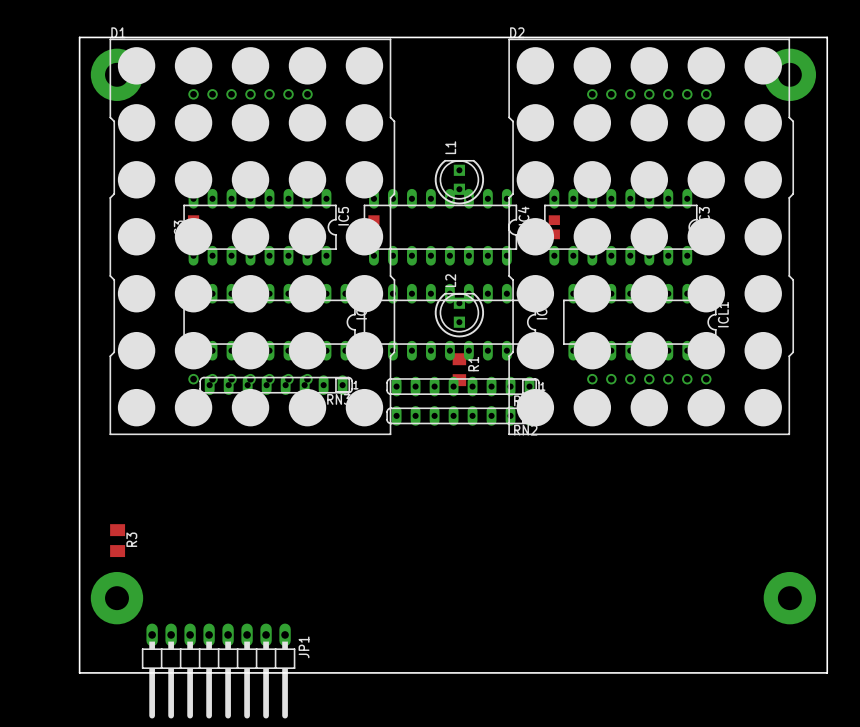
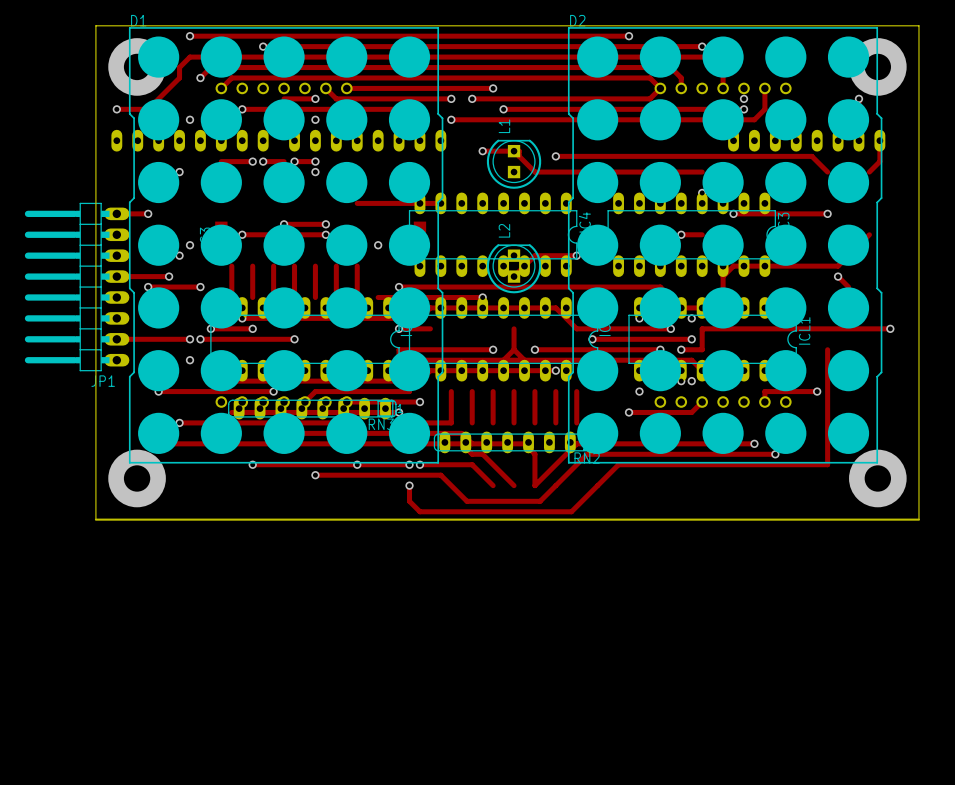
track: none -> (190, 36) (629, 36)
via: none -> (190, 36)
via: none -> (629, 36)
track: none -> (263, 46) (702, 46)
via: none -> (263, 46)
via: none -> (702, 46)
track: none -> (200, 77) (210, 67) (670, 67) (681, 77) (681, 88)
via: none -> (200, 77)
track: none -> (221, 88) (231, 77) (649, 77) (660, 88) (649, 98) (472, 98)
track: none -> (325, 88) (336, 98) (451, 98)
track: none -> (346, 88) (493, 88)
via: none -> (493, 88)
track: none -> (723, 88) (723, 67) (712, 57) (190, 57) (179, 67) (179, 77) (148, 109) (116, 109)
track: none -> (764, 88) (764, 109) (754, 119) (451, 119)
track: none -> (284, 98) (315, 98)
via: none -> (315, 98)
via: none -> (451, 98)
via: none -> (472, 98)
via: none -> (744, 98)
via: none -> (858, 98)
via: none -> (116, 109)
track: none -> (242, 109) (419, 109)
via: none -> (242, 109)
track: none -> (503, 109) (744, 109)
via: none -> (503, 109)
via: none -> (744, 109)
via: none -> (190, 119)
via: none -> (315, 119)
via: none -> (451, 119)
part: none -> (190, 140)
part: none -> (367, 140)
part: none -> (806, 140)
track: none -> (879, 140) (879, 161) (869, 172)
track: none -> (482, 151) (519, 151) (519, 156)
via: none -> (482, 151)
track: none -> (514, 151) (534, 172) (702, 172)
track: none -> (555, 156) (811, 156) (827, 172)
via: none -> (555, 156)
track: none -> (221, 161) (252, 161)
via: none -> (252, 161)
track: none -> (263, 161) (284, 161)
via: none -> (263, 161)
track: none -> (294, 161) (315, 161)
via: none -> (294, 161)
via: none -> (315, 161)
via: none -> (179, 172)
via: none -> (315, 172)
L1 position: (459, 182) -> (514, 164)
via: none -> (702, 192)
track: none -> (357, 203) (440, 203)
track: none -> (116, 213) (148, 213)
via: none -> (148, 213)
track: none -> (733, 213) (827, 213)
via: none -> (733, 213)
via: none -> (827, 213)
track: none -> (284, 224) (325, 224)
via: none -> (284, 224)
via: none -> (325, 224)
track: none -> (242, 234) (325, 234)
via: none -> (242, 234)
IC5: (260, 227) -> none
via: none -> (325, 234)
part: (554, 227) -> none
track: none -> (681, 234) (702, 234)
via: none -> (681, 234)
track: none -> (869, 234) (838, 266) (733, 266) (723, 276) (723, 287)
via: none -> (190, 245)
via: none -> (378, 245)
via: none -> (179, 255)
track: none -> (576, 255) (534, 255) (514, 276)
via: none -> (576, 255)
track: none -> (231, 266) (231, 297)
track: none -> (252, 266) (252, 297)
track: none -> (273, 266) (273, 297)
track: none -> (294, 266) (294, 297)
track: none -> (315, 266) (315, 297)
track: none -> (336, 266) (336, 297)
track: none -> (357, 266) (357, 297)
track: none -> (116, 276) (169, 276)
via: none -> (169, 276)
track: none -> (838, 276) (848, 287)
via: none -> (838, 276)
track: none -> (148, 287) (200, 287)
via: none -> (148, 287)
via: none -> (200, 287)
track: none -> (399, 287) (660, 287) (681, 307) (744, 307)
via: none -> (399, 287)
track: none -> (378, 297) (482, 297)
via: none -> (482, 297)
track: none -> (242, 318) (419, 318) (430, 307) (555, 307) (576, 328) (670, 328)
via: none -> (242, 318)
via: none -> (639, 318)
via: none -> (691, 318)
track: none -> (210, 328) (252, 328)
via: none -> (210, 328)
via: none -> (252, 328)
track: none -> (399, 328) (430, 328)
via: none -> (399, 328)
track: none -> (514, 328) (514, 349)
via: none -> (670, 328)
track: none -> (890, 328) (702, 328) (702, 349) (681, 349)
via: none -> (890, 328)
L2 position: (459, 315) -> (514, 268)
track: none -> (116, 339) (190, 339)
via: none -> (190, 339)
track: none -> (200, 339) (294, 339)
via: none -> (200, 339)
via: none -> (294, 339)
track: none -> (592, 339) (691, 339)
via: none -> (592, 339)
via: none -> (691, 339)
track: none -> (493, 349) (399, 349) (399, 381) (221, 381)
via: none -> (493, 349)
track: none -> (514, 349) (524, 360)
track: none -> (514, 349) (503, 360)
track: none -> (534, 349) (660, 349)
via: none -> (534, 349)
via: none -> (660, 349)
via: none -> (681, 349)
track: none -> (827, 349) (827, 464) (618, 464) (571, 511) (419, 511) (409, 501) (409, 485)
via: none -> (190, 360)
track: none -> (555, 370) (430, 370) (419, 381)
via: none -> (555, 370)
track: none -> (744, 370) (702, 370) (691, 360) (409, 360) (409, 391) (315, 391) (304, 402)
via: none -> (681, 381)
via: none -> (691, 381)
track: none -> (158, 391) (273, 391)
via: none -> (158, 391)
via: none -> (273, 391)
track: none -> (451, 391) (451, 422) (419, 422)
track: none -> (472, 391) (472, 422)
track: none -> (493, 391) (493, 422)
track: none -> (514, 391) (514, 422)
R1: (459, 369) -> none
track: none -> (534, 391) (534, 422)
track: none -> (555, 391) (555, 422)
track: none -> (576, 391) (576, 422)
via: none -> (639, 391)
track: none -> (817, 391) (764, 391) (764, 402)
via: none -> (817, 391)
track: none -> (346, 402) (419, 402)
via: none -> (419, 402)
track: none -> (702, 402) (691, 412) (629, 412)
part: (463, 386) -> none
track: none -> (231, 412) (399, 412)
via: none -> (399, 412)
via: none -> (629, 412)
track: none -> (179, 422) (336, 422)
via: none -> (179, 422)
track: none -> (294, 433) (461, 433) (472, 443) (524, 443) (534, 454) (534, 485) (576, 443) (754, 443)
track: none -> (148, 443) (461, 443) (472, 454) (482, 454) (514, 485)
via: none -> (754, 443)
track: none -> (775, 454) (587, 454) (540, 501) (467, 501) (440, 475) (315, 475)
via: none -> (775, 454)
track: none -> (252, 464) (409, 464)
via: none -> (252, 464)
via: none -> (357, 464)
via: none -> (409, 464)
track: none -> (419, 464) (472, 464) (493, 485)
via: none -> (419, 464)
via: none -> (315, 475)
via: none -> (137, 478)
via: none -> (877, 478)
via: none -> (409, 485)
board edge: (79, 486) (79, 672) (827, 672) (827, 486) -> (95, 519) (918, 519)
R3: (117, 540) -> none
via: (116, 598) -> none
via: (789, 598) -> none
JP1 rotation: 0° (218, 671) -> 90° clockwise (77, 287)
JP1 position: (218, 671) -> (77, 287)

